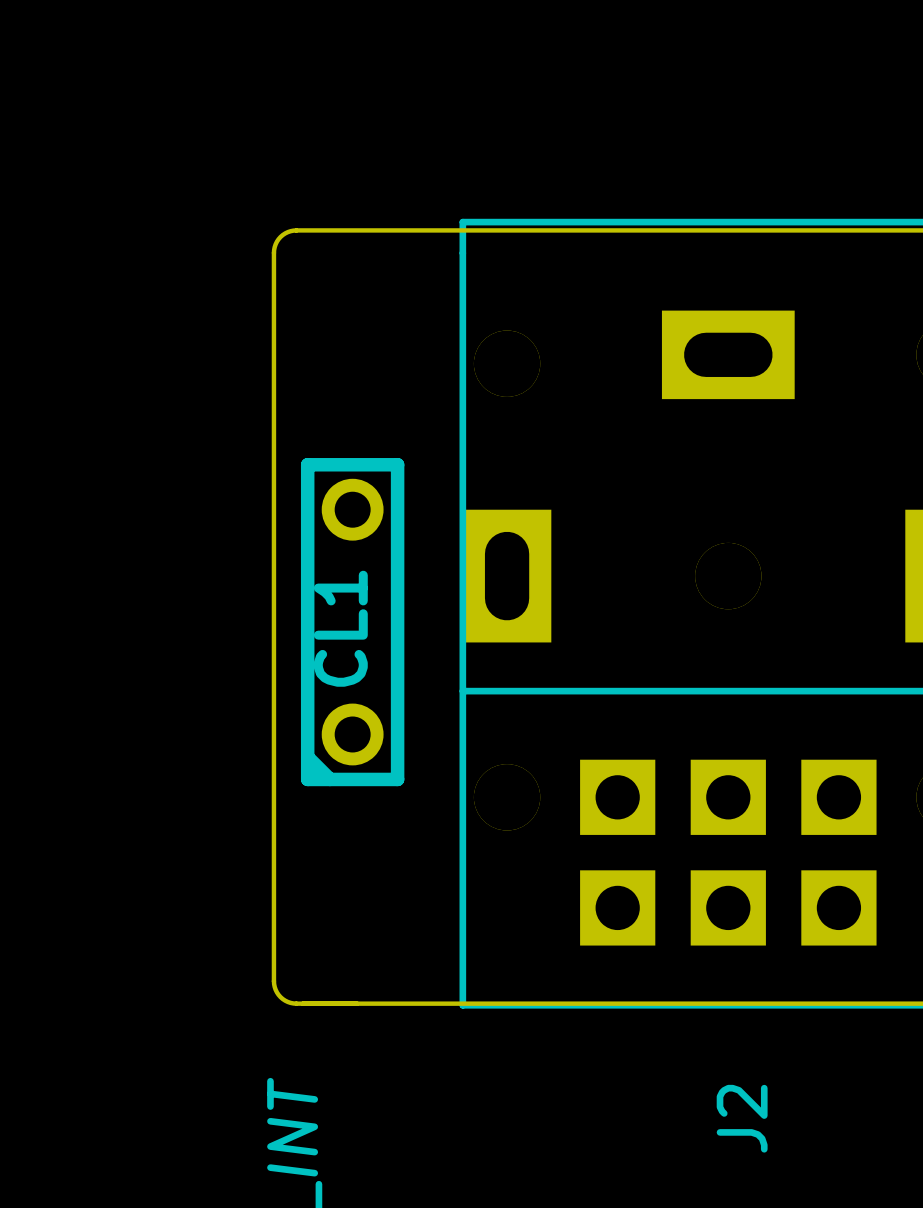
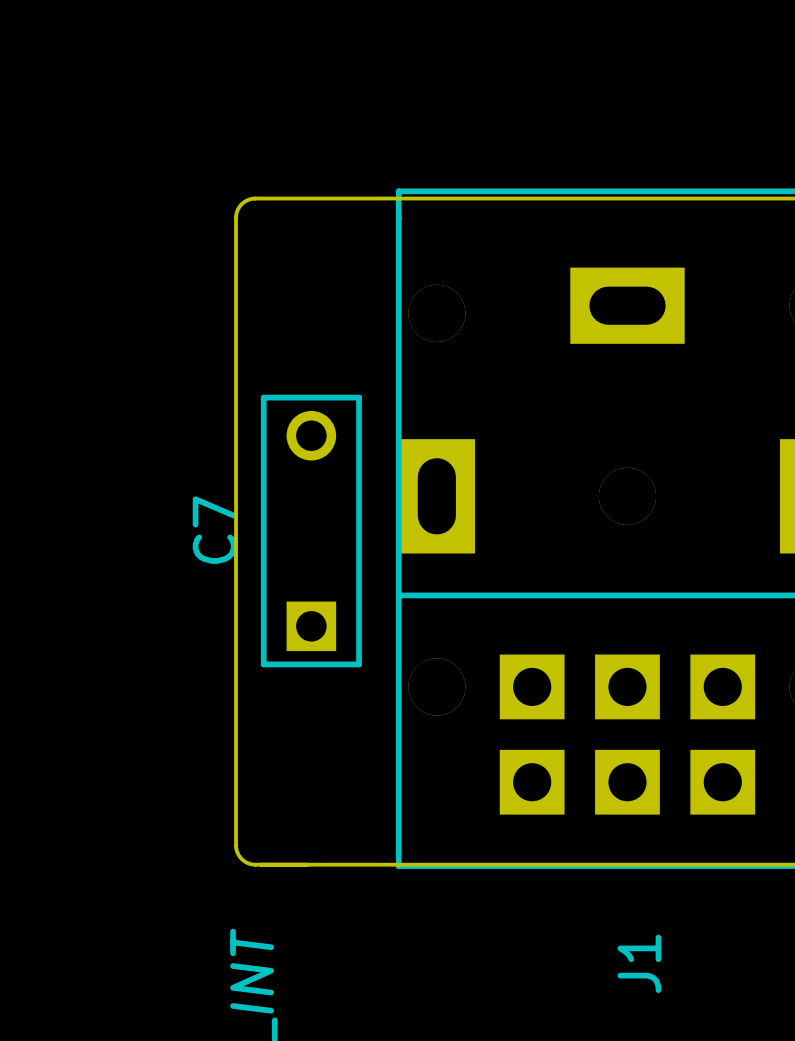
C7: none -> (311, 531)
CL1: (352, 622) -> none
J2 name: J2 (742, 1118) -> J1 (639, 963)

